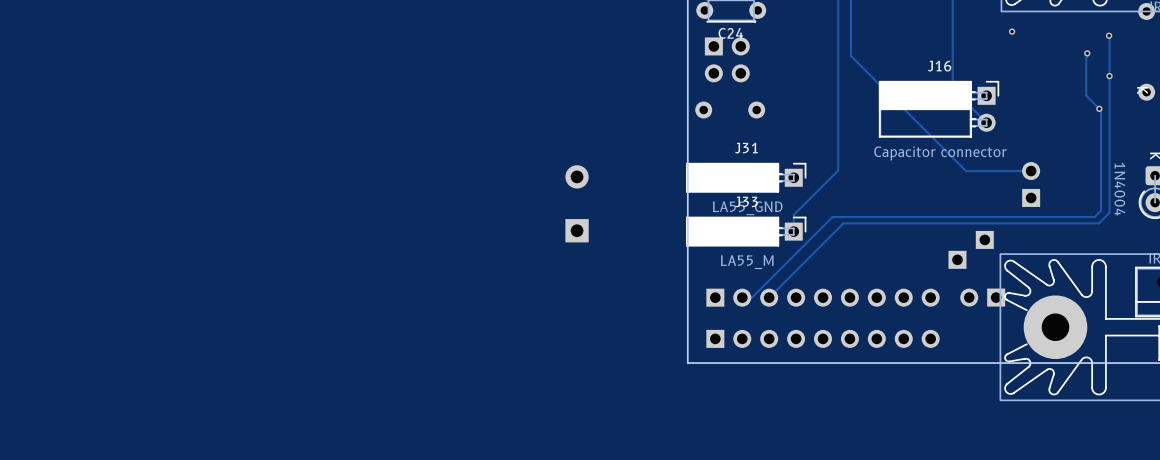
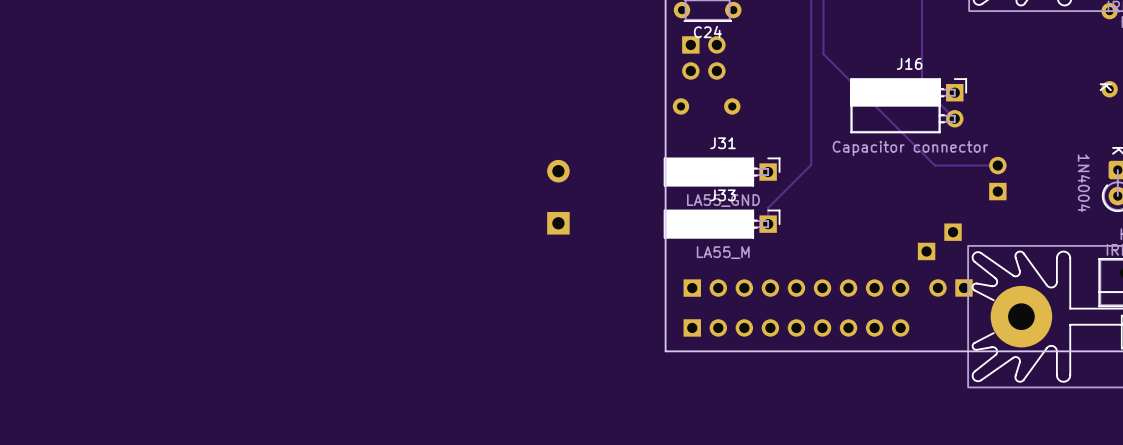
via: (1012, 31) -> none
track: (1109, 35) (1109, 212) (1098, 223) (843, 223) (769, 297) (769, 294) -> none
via: (1109, 35) -> none
via: (1087, 53) -> none
track: (1087, 56) (1086, 95) (1101, 112) (1101, 210) (1094, 217) (832, 217) (751, 297) (742, 297) -> none
via: (1109, 76) -> none
via: (1099, 108) -> none

